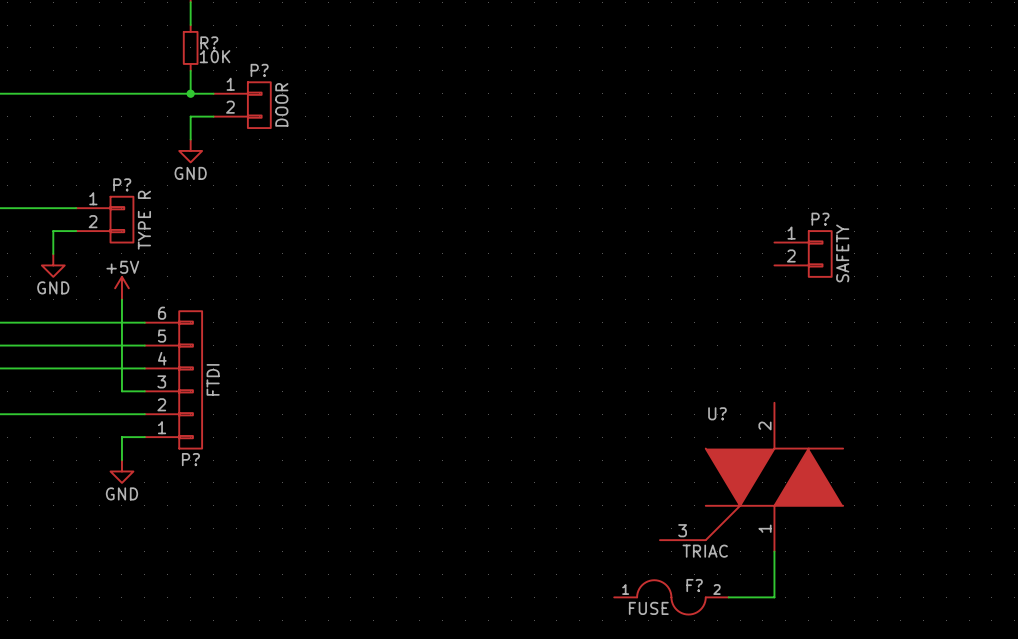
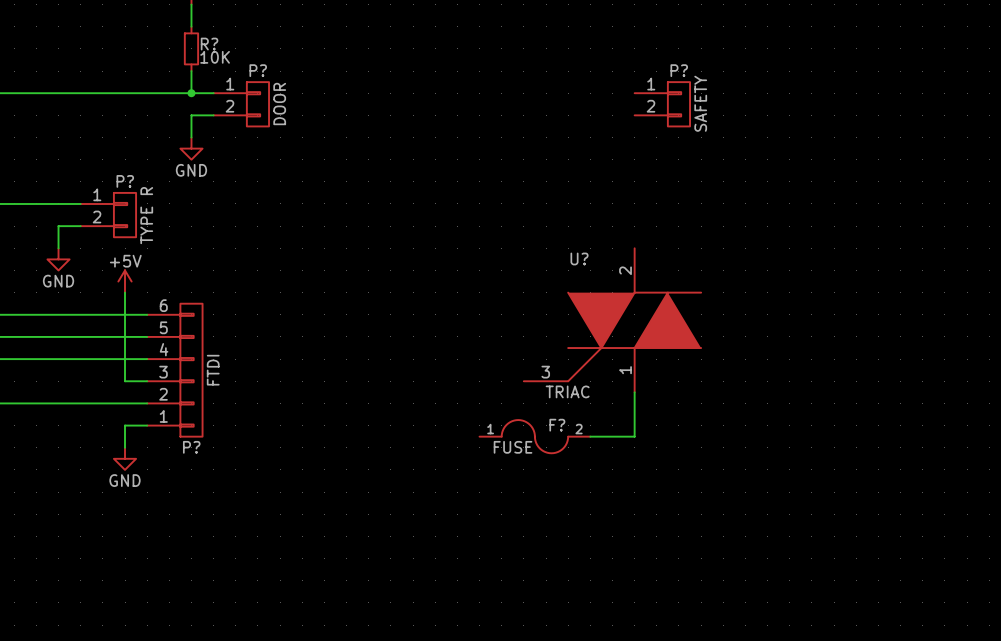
P? position: (803, 253) -> (662, 104)
U? position: (751, 477) -> (612, 320)
wire: (774, 551) (774, 597) (728, 597) -> (634, 392) (634, 436) (590, 436)
F? position: (671, 597) -> (534, 436)

